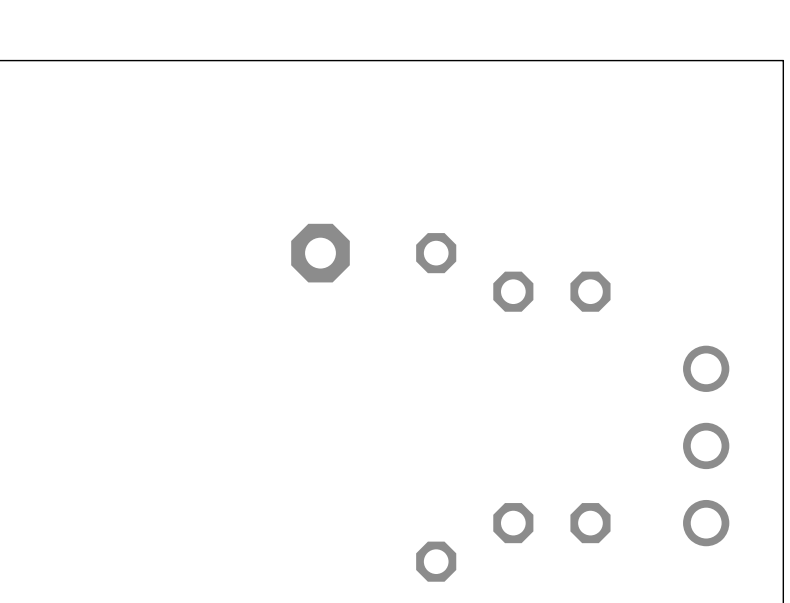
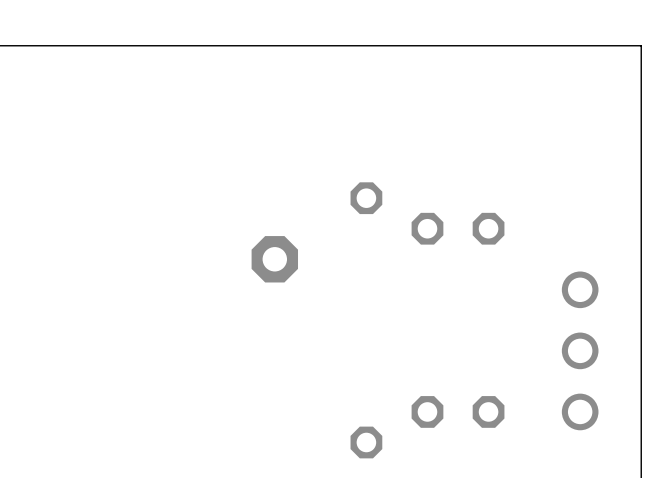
part position: (320, 253) -> (274, 259)

